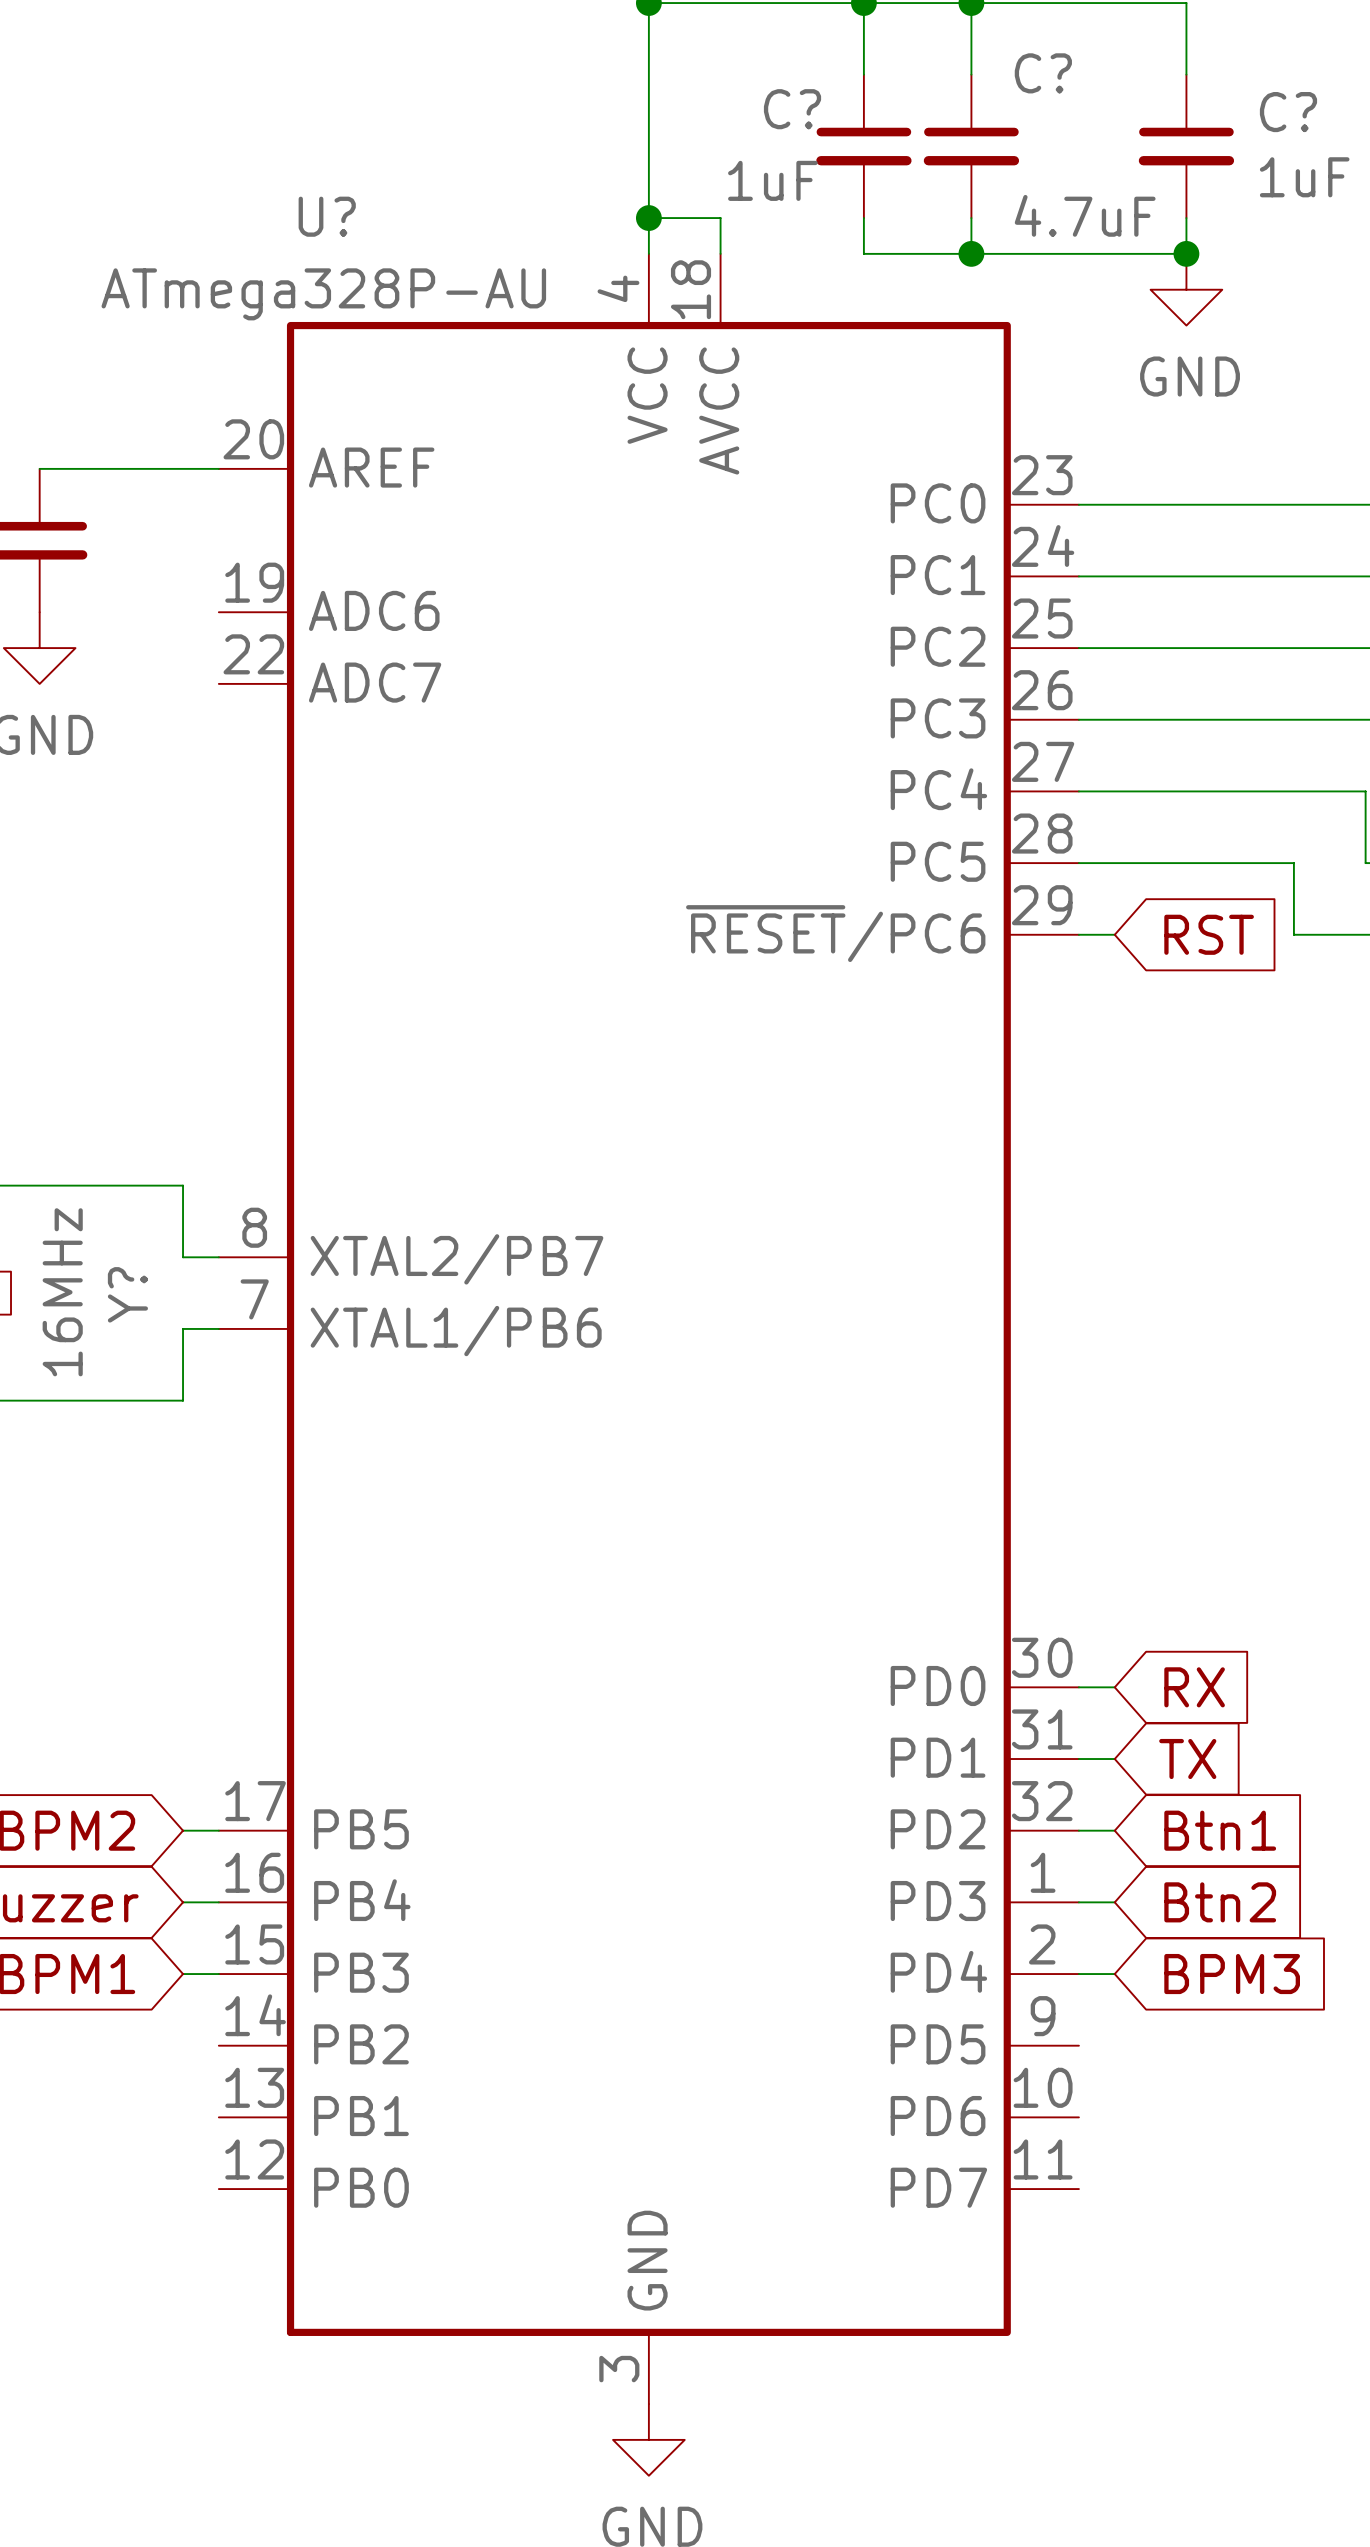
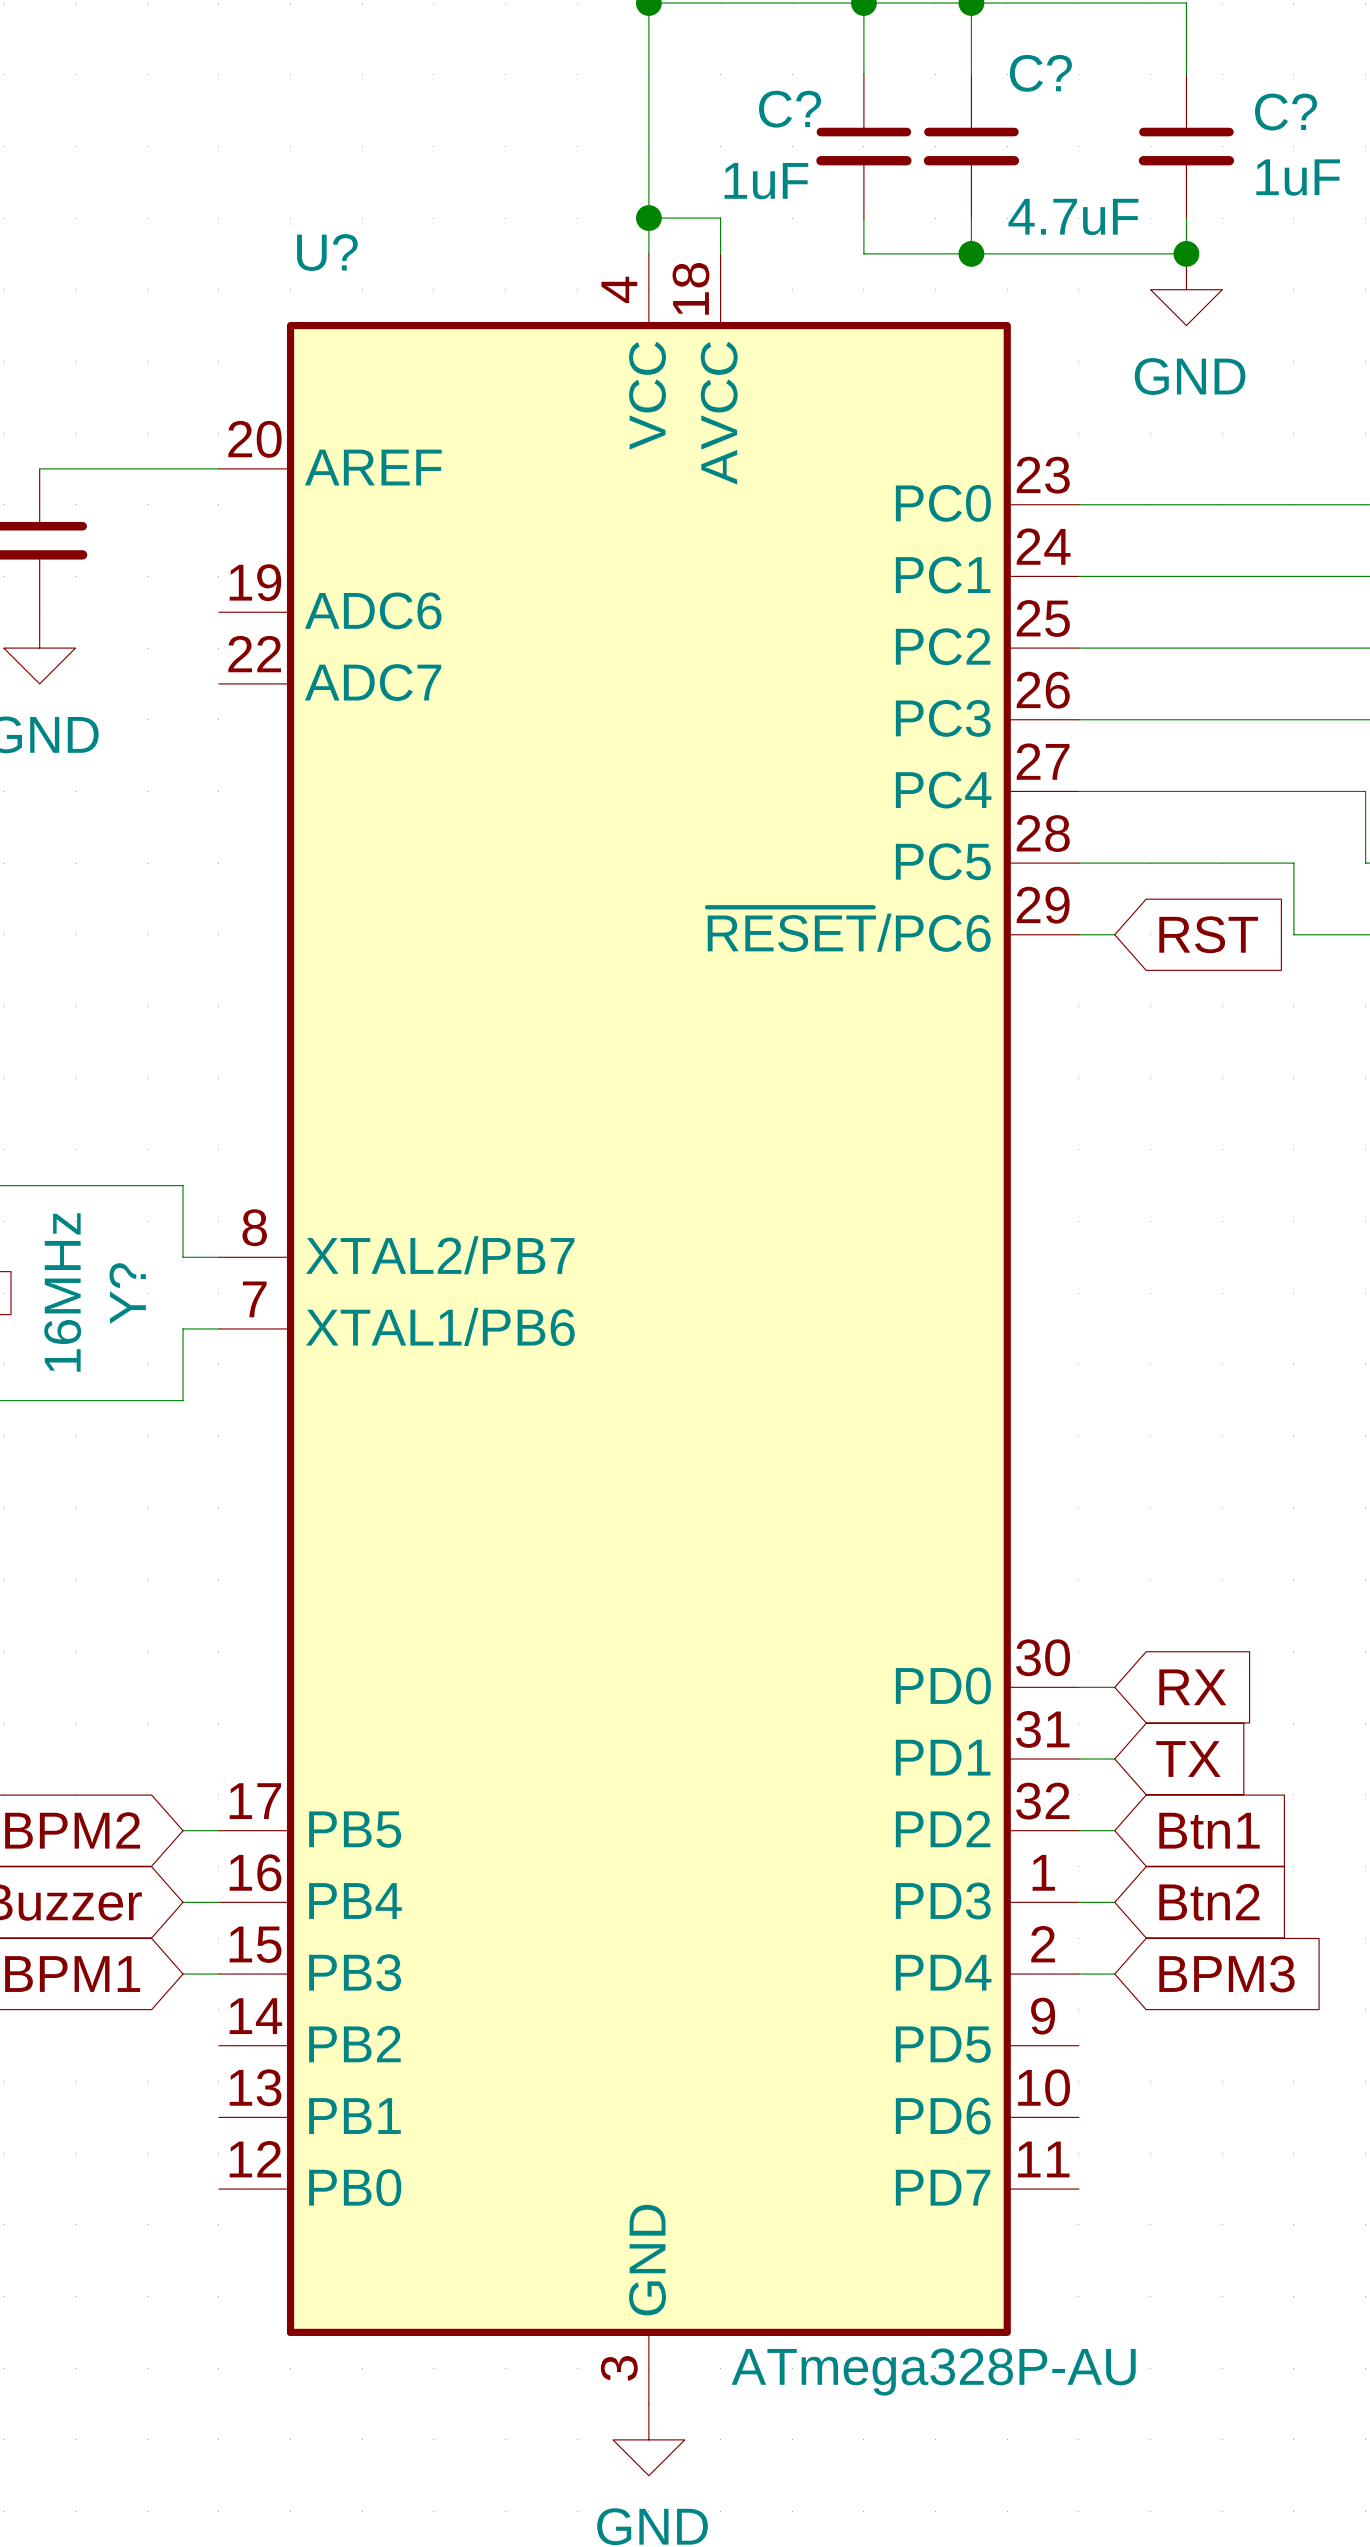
U? name position: U? (327, 216) -> U? (327, 252)
U? value position: ATmega328P-AU (323, 294) -> ATmega328P-AU (933, 2372)

